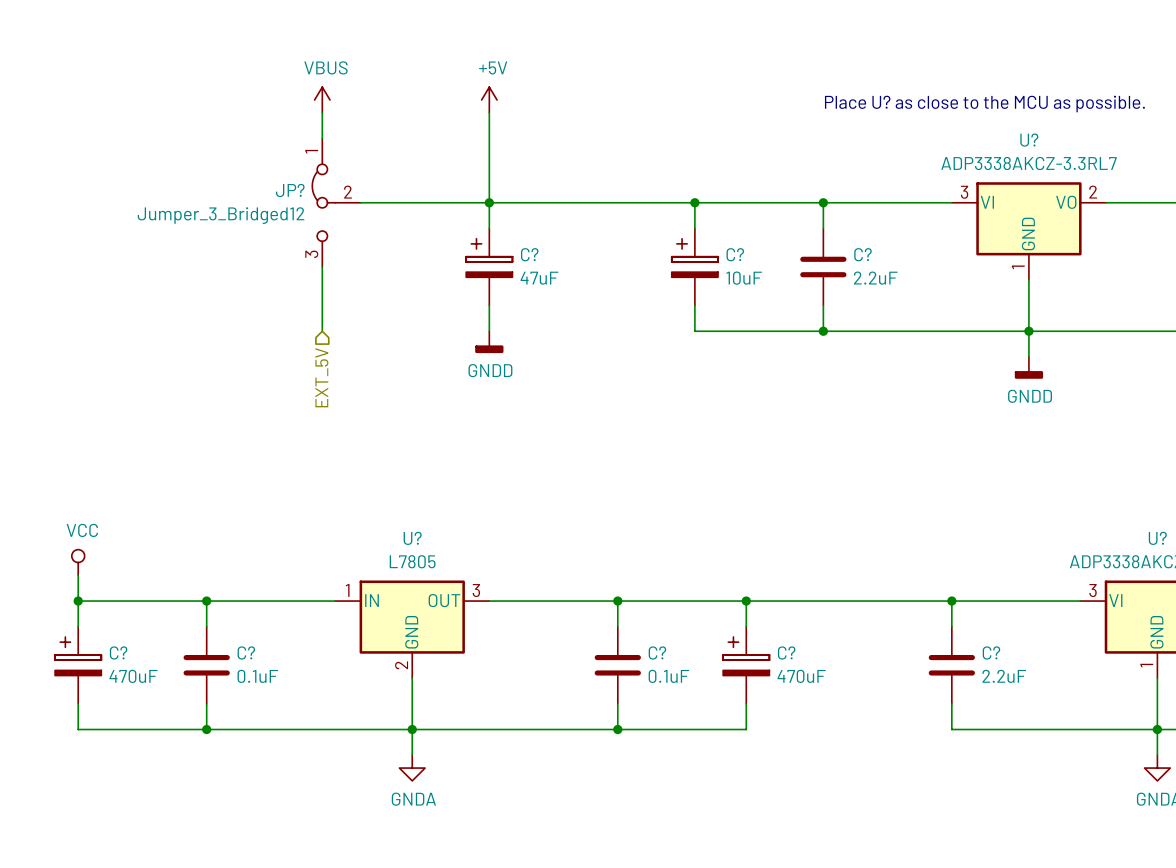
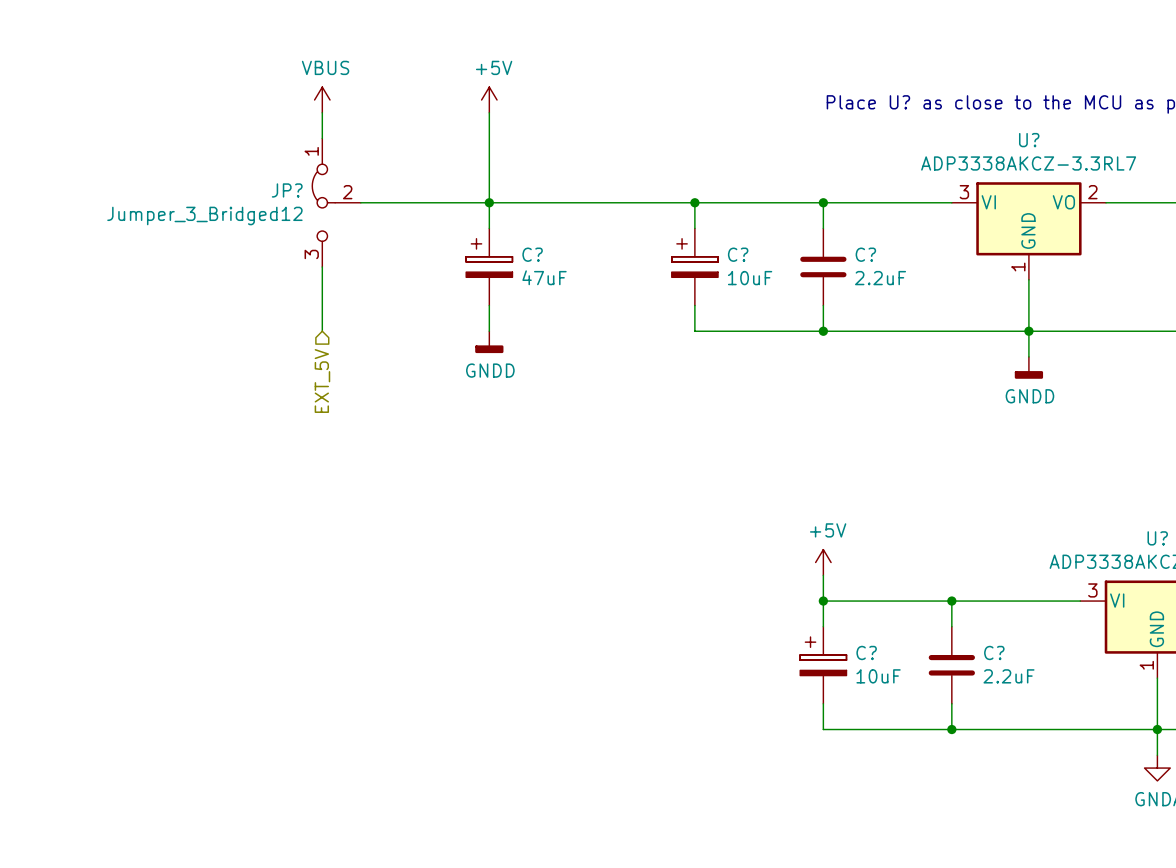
power symbol: VCC (78, 562) -> none
power symbol: none -> +5V (823, 562)
wire: (78, 575) (78, 626) -> none
wire: none -> (823, 575) (823, 626)
wire: (78, 601) (335, 601) -> none
junction: (78, 601) -> none
wire: (206, 601) (206, 626) -> none
junction: (206, 601) -> none
wire: (489, 601) (823, 601) -> none
wire: (617, 601) (617, 626) -> none
junction: (617, 601) -> none
wire: (746, 601) (746, 626) -> none
junction: (746, 601) -> none
junction: none -> (823, 601)
U?: L7805 (412, 629) -> none
C?: 470uF (78, 665) -> none
C?: 0.1uF (206, 665) -> none
C?: 0.1uF (617, 665) -> none
C?: 470uF (746, 665) -> none
C?: none -> 10uF (823, 665)
wire: (412, 678) (412, 755) -> none
wire: (78, 703) (78, 729) (746, 729) (746, 703) -> none
wire: (206, 703) (206, 729) -> none
wire: (617, 703) (617, 729) -> none
wire: none -> (823, 703) (823, 729) (951, 729)
junction: (206, 729) -> none
junction: (412, 729) -> none
junction: (617, 729) -> none
junction: none -> (951, 729)
power symbol: GNDA (412, 768) -> none

